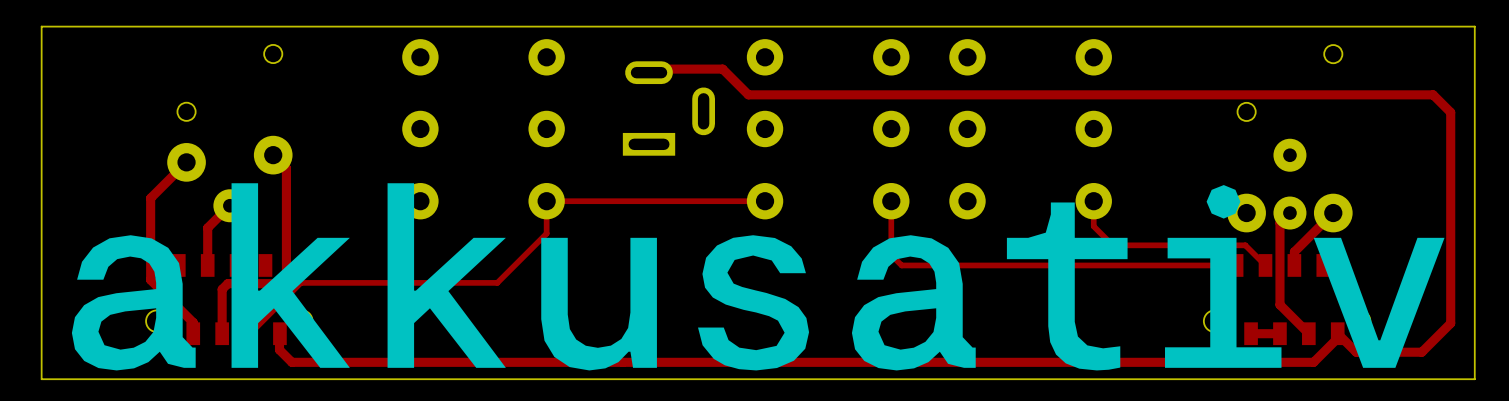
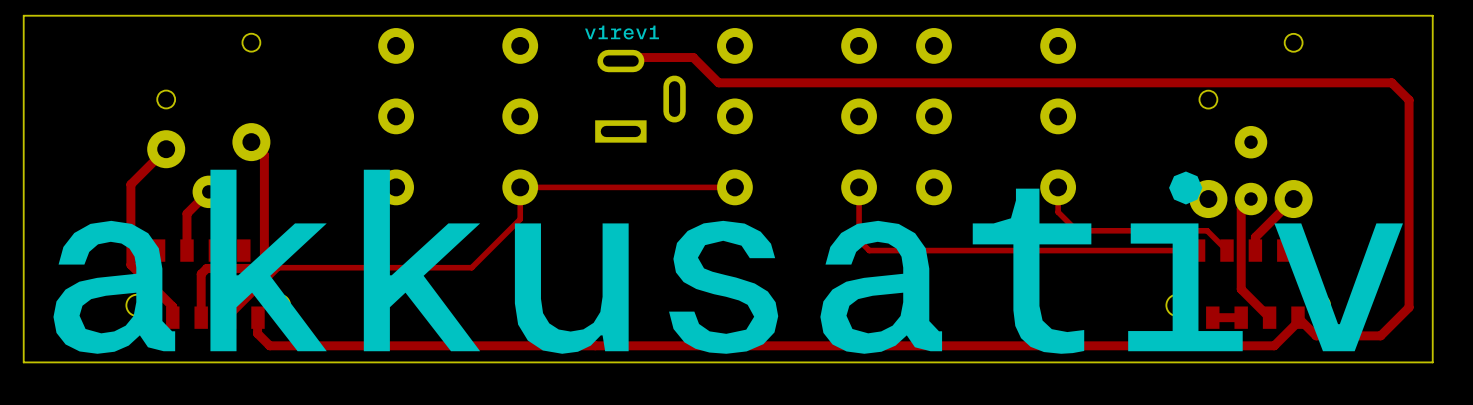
drawing: none -> [585, 25, 659, 40]

